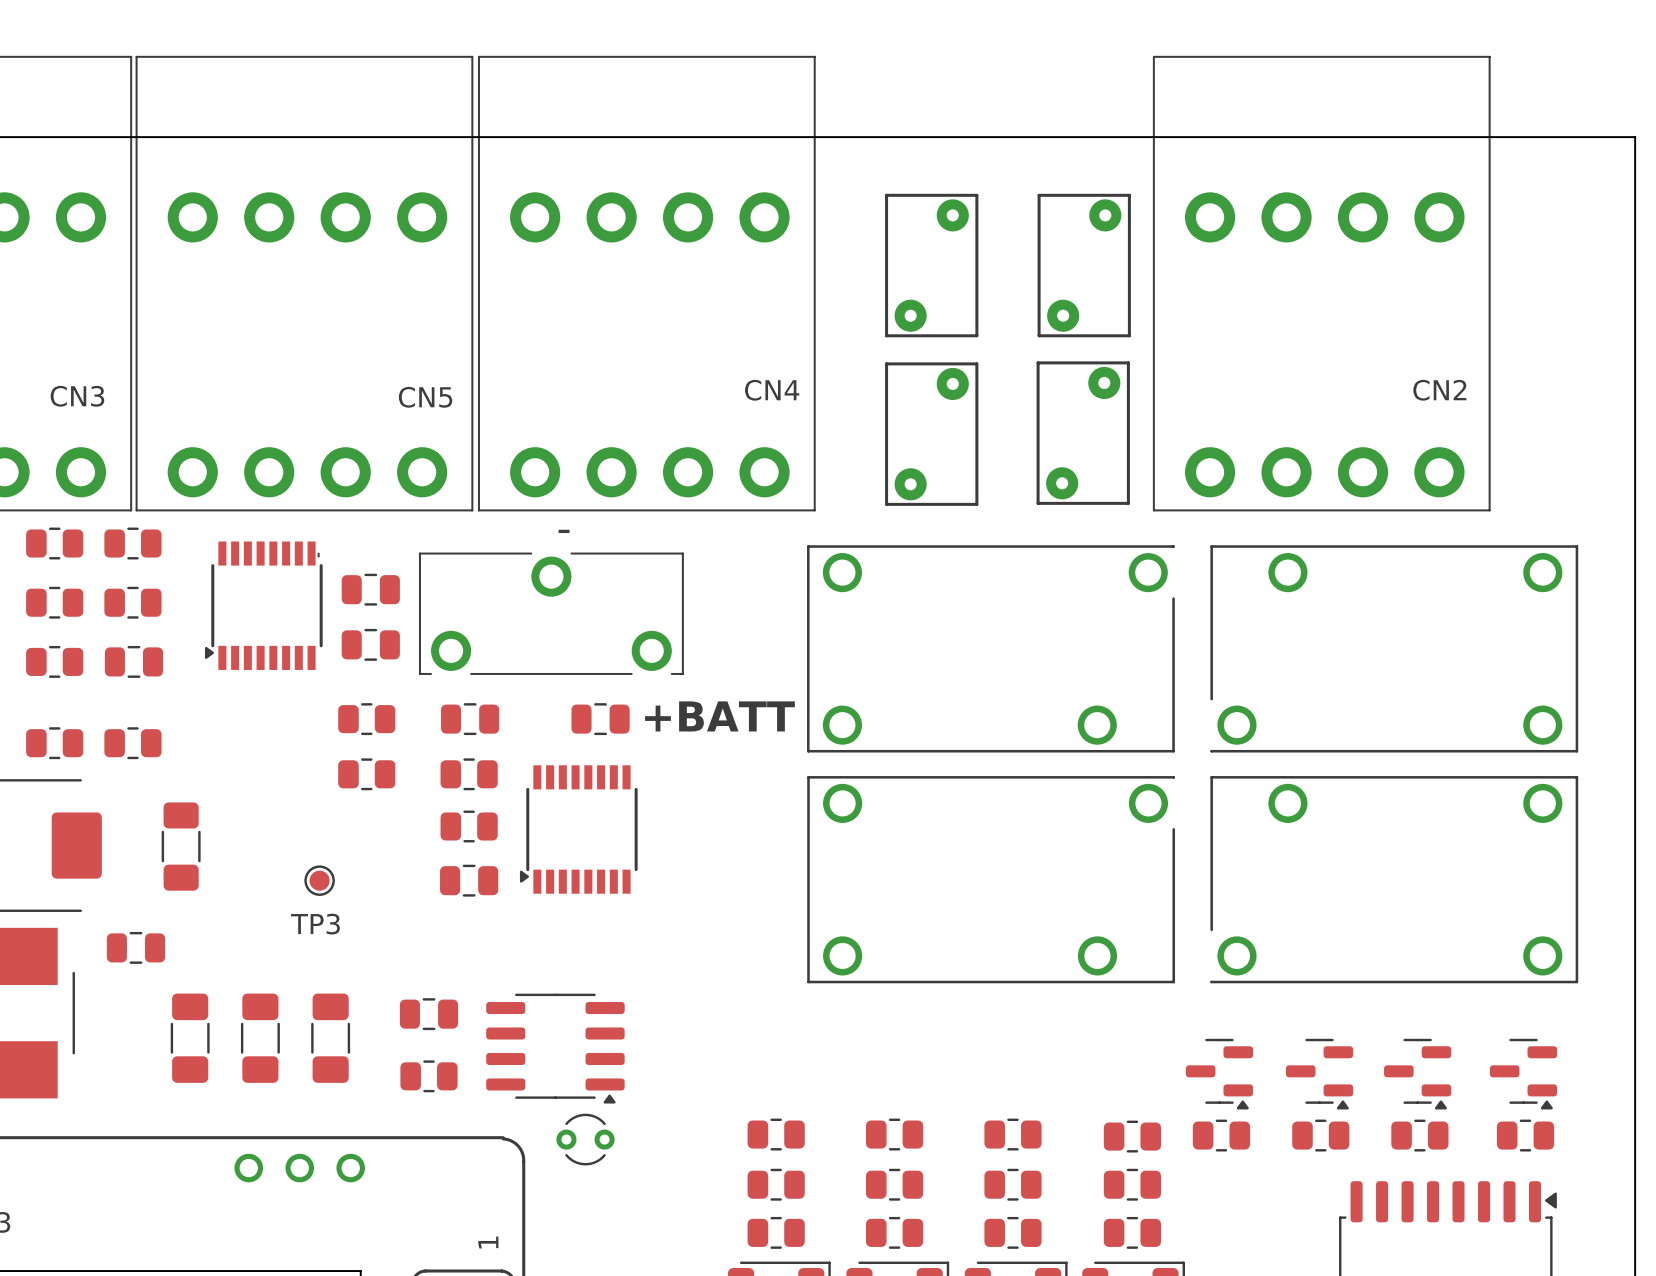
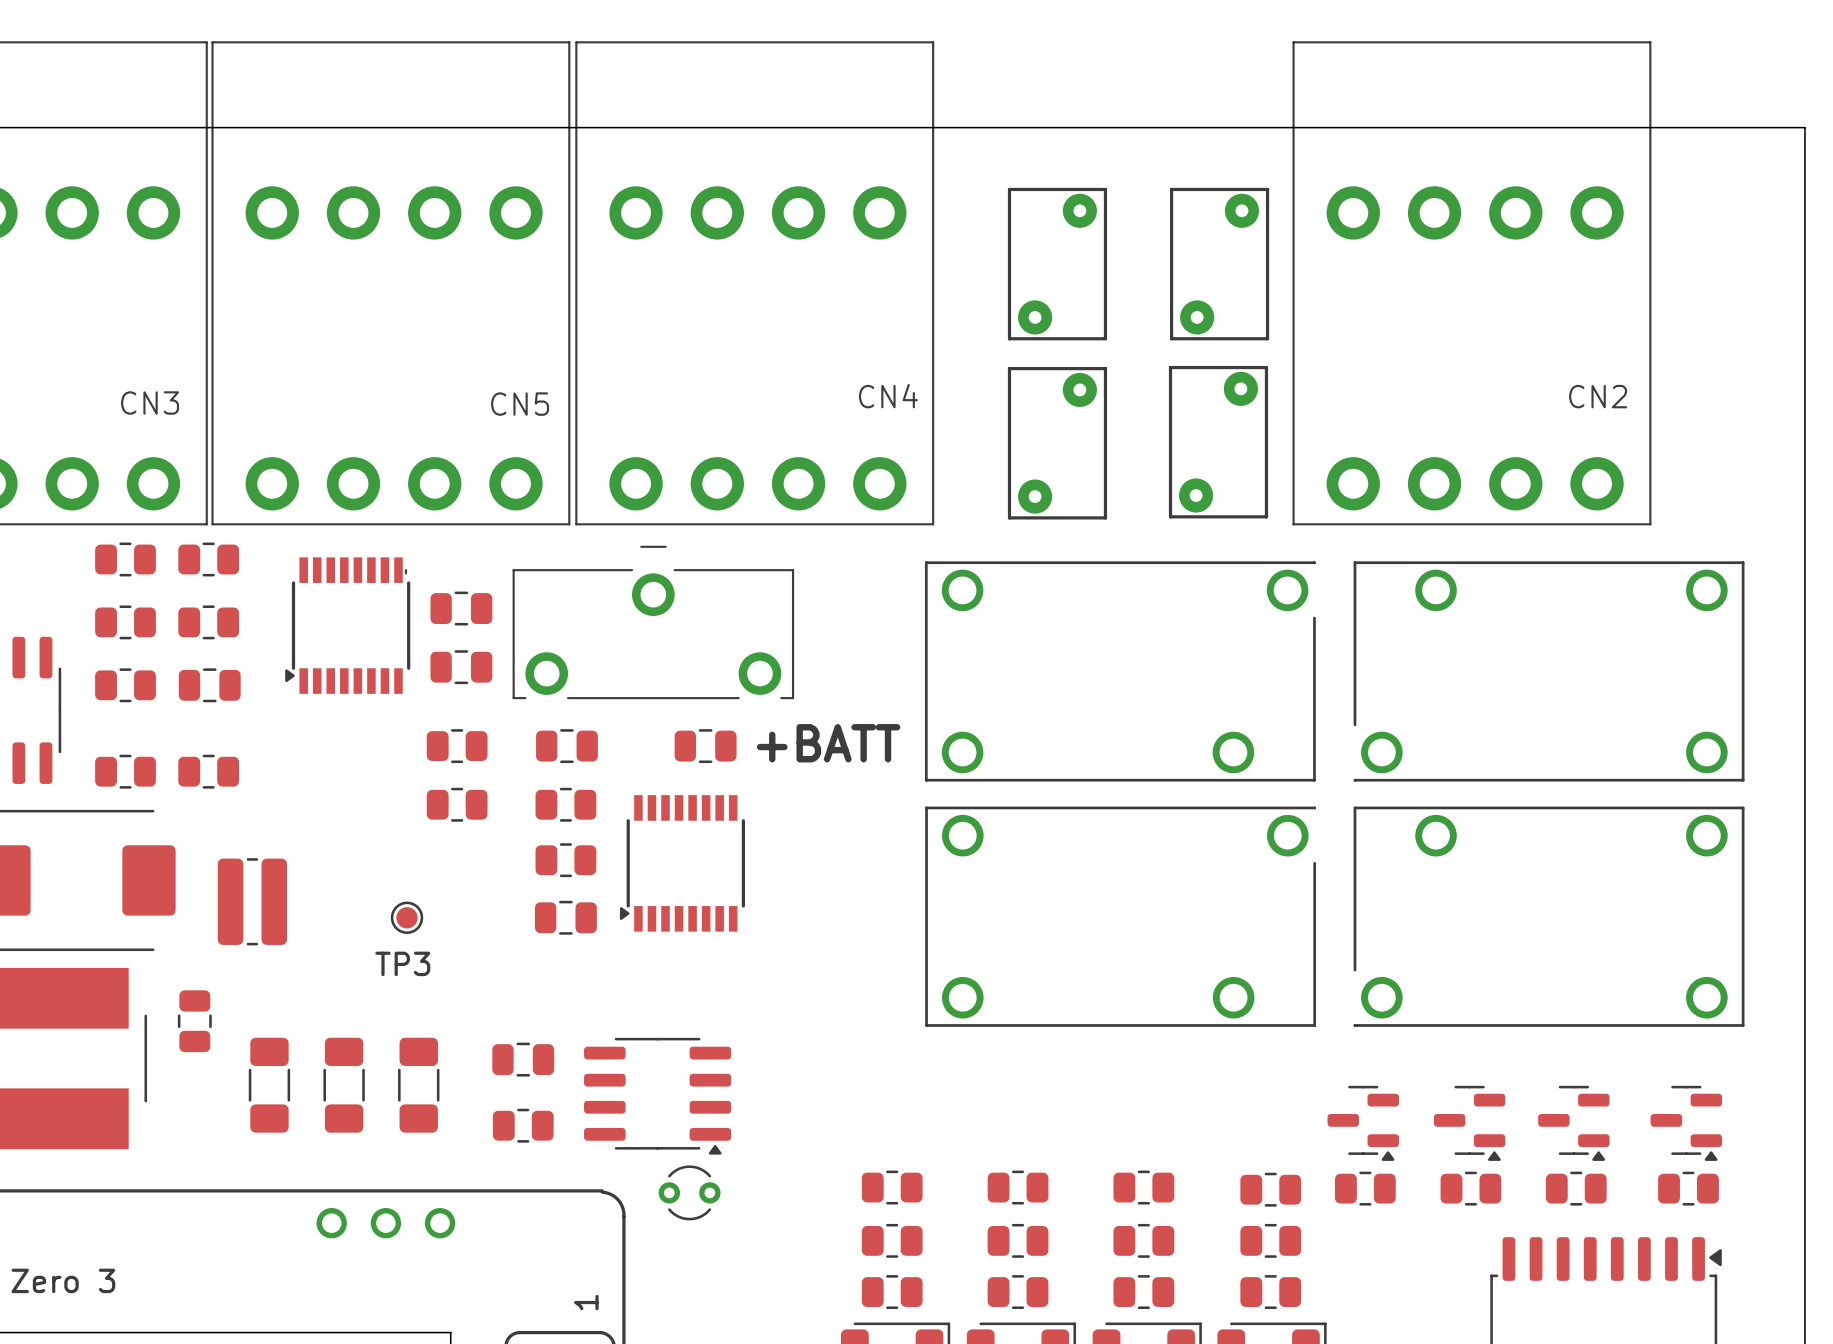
part: (181, 846) -> none
part: none -> (252, 901)
part rotation: 0° (135, 947) -> 90° clockwise (194, 1021)

